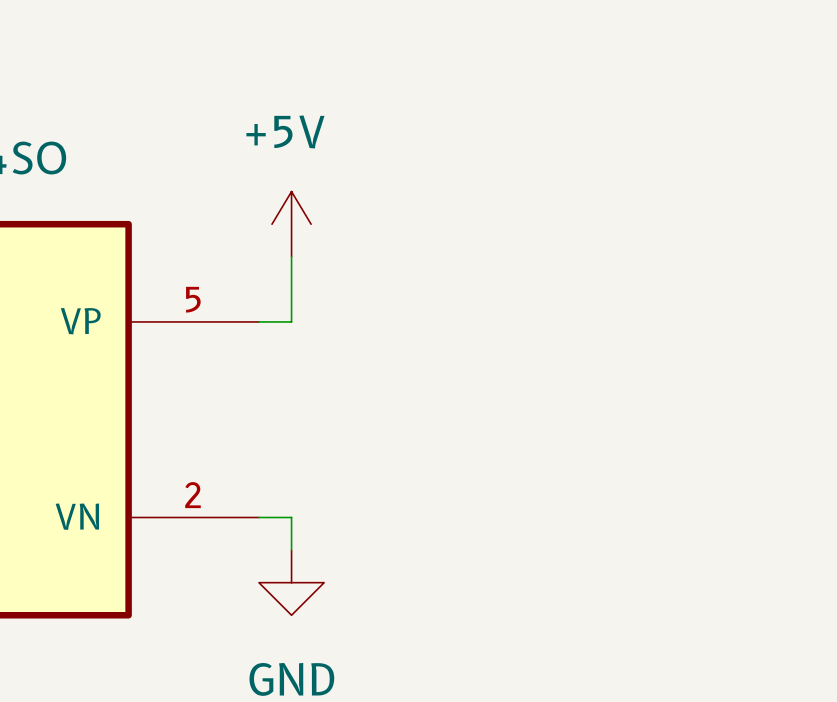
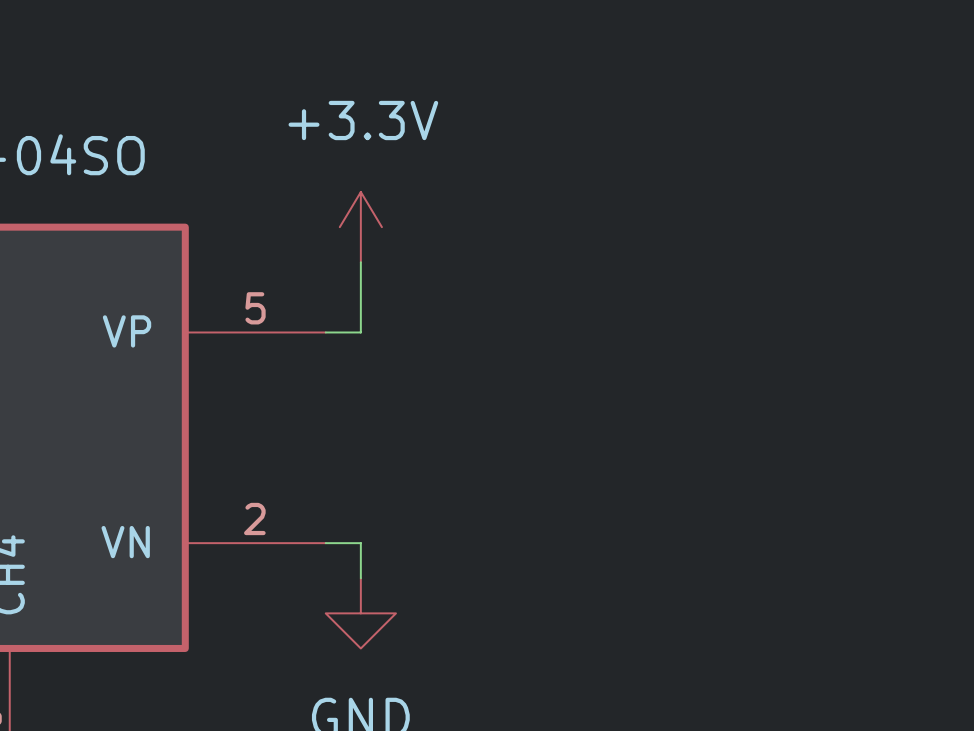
power symbol: +5V (291, 224) -> +3.3V (360, 227)

